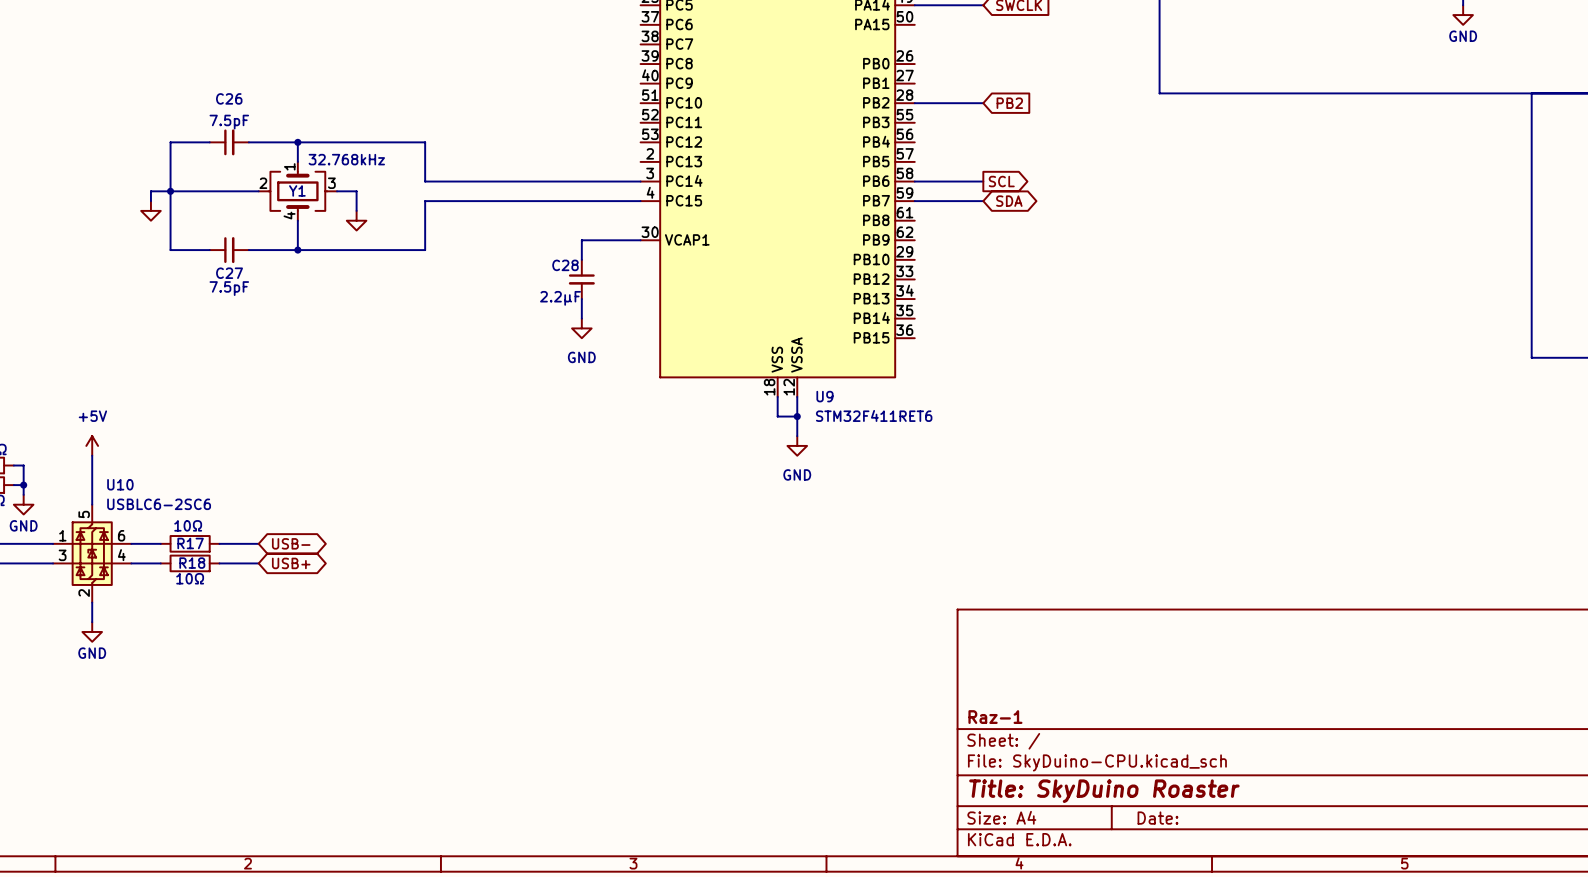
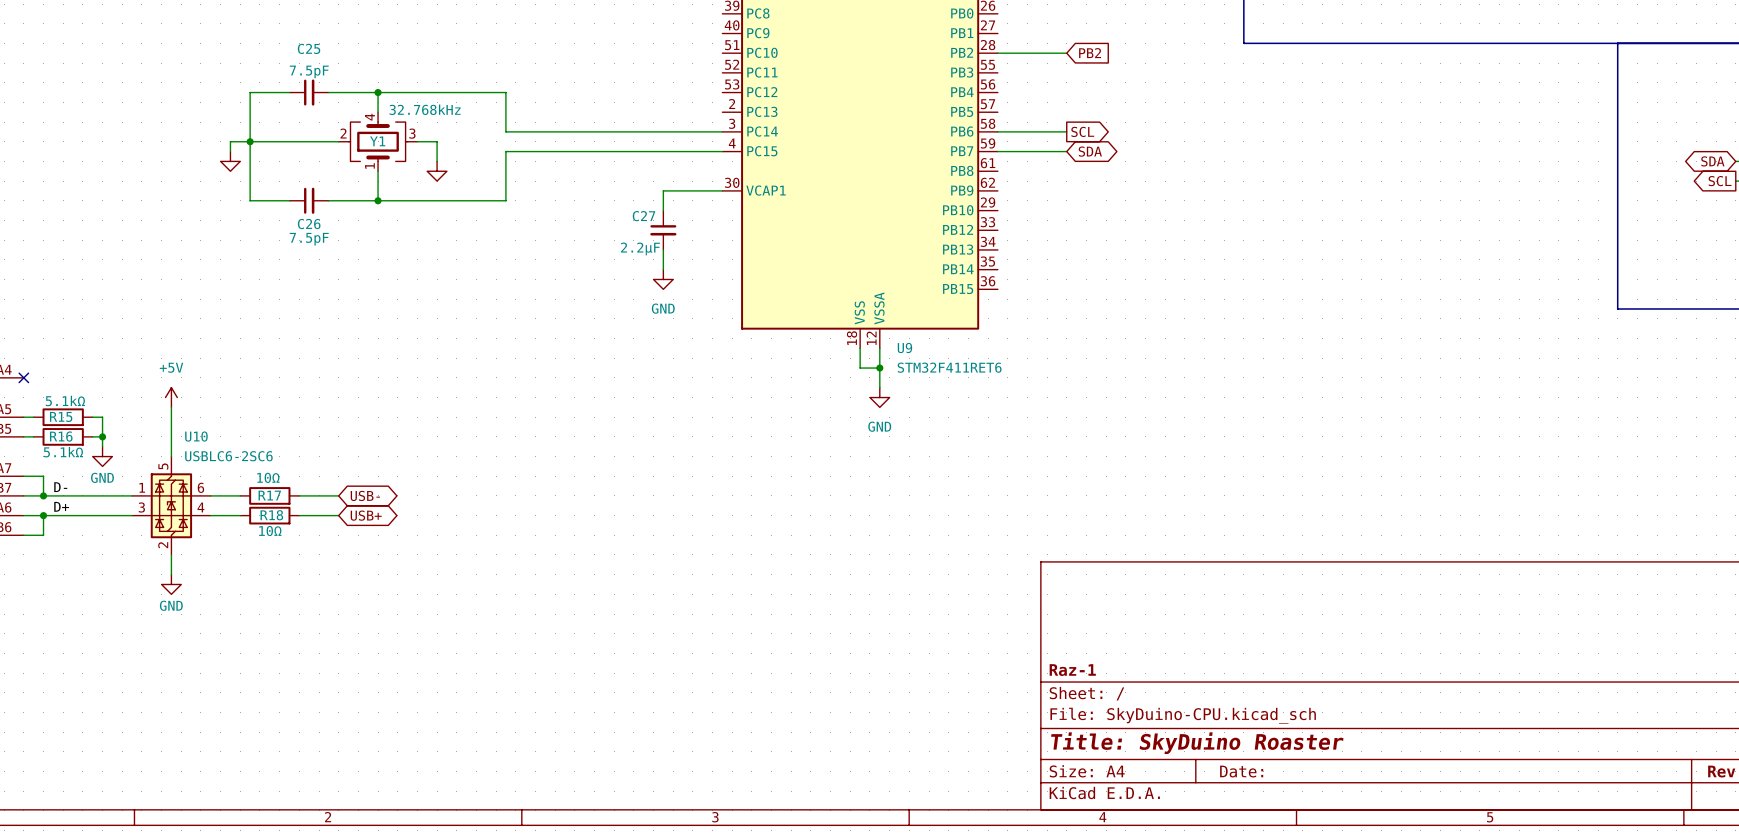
C26 name: C26 (229, 98) -> C25 (309, 48)
Y1 flip: as is (297, 191) -> up-down (378, 141)
C28 name: C28 (565, 265) -> C27 (644, 216)
C27 name: C27 (229, 273) -> C26 (309, 224)

